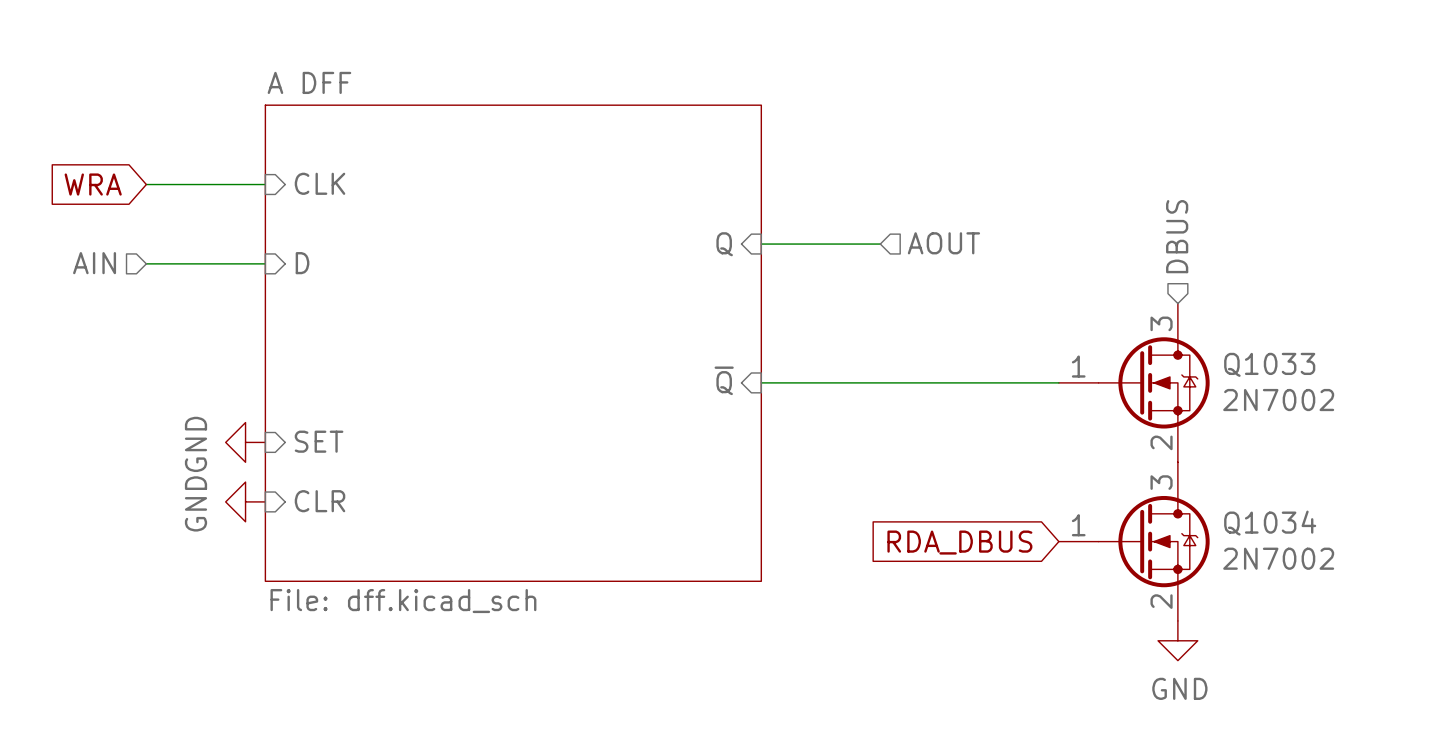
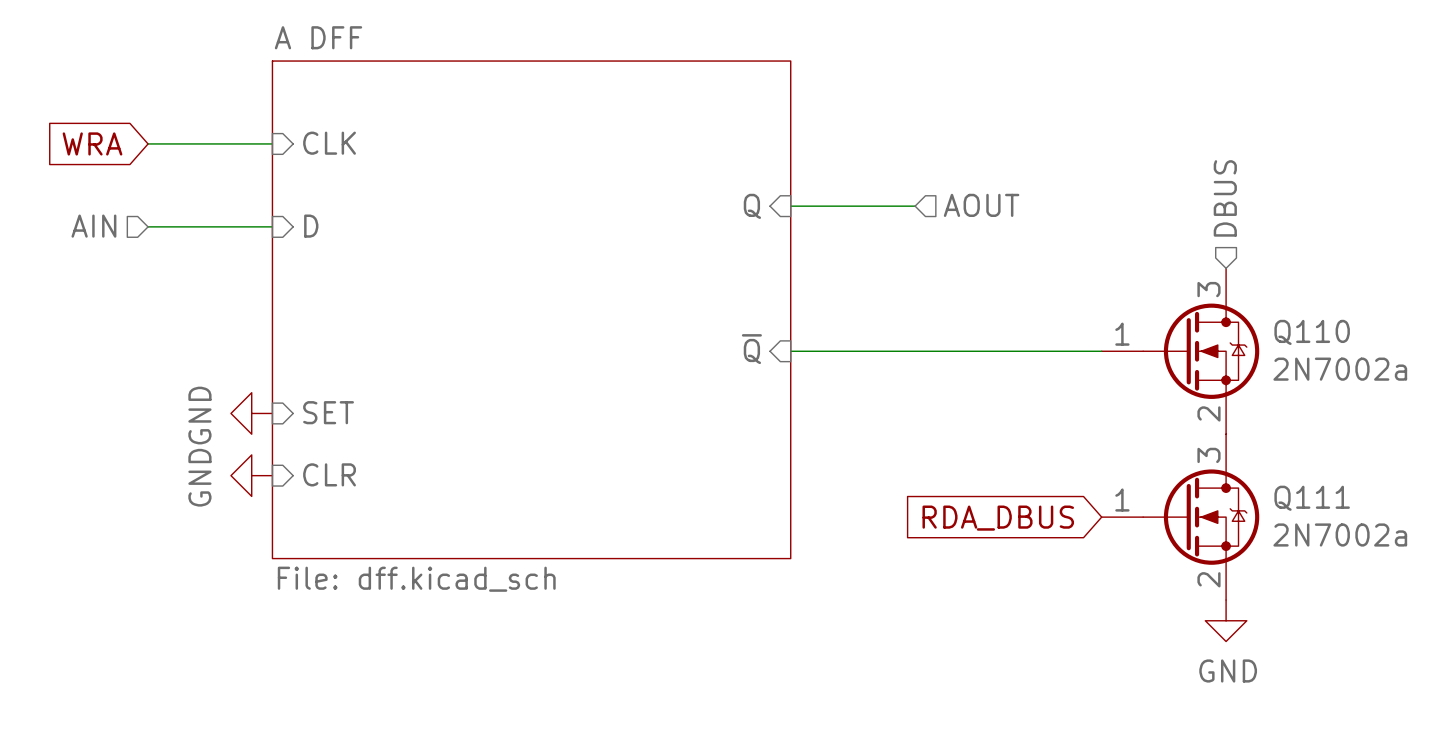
Q1033 name: Q1033 (1269, 364) -> Q110 (1312, 332)
Q1033 value: 2N7002 (1278, 400) -> 2N7002a (1340, 369)
Q1034 name: Q1034 (1270, 523) -> Q111 (1312, 498)
Q1034 value: 2N7002 (1278, 558) -> 2N7002a (1340, 535)

